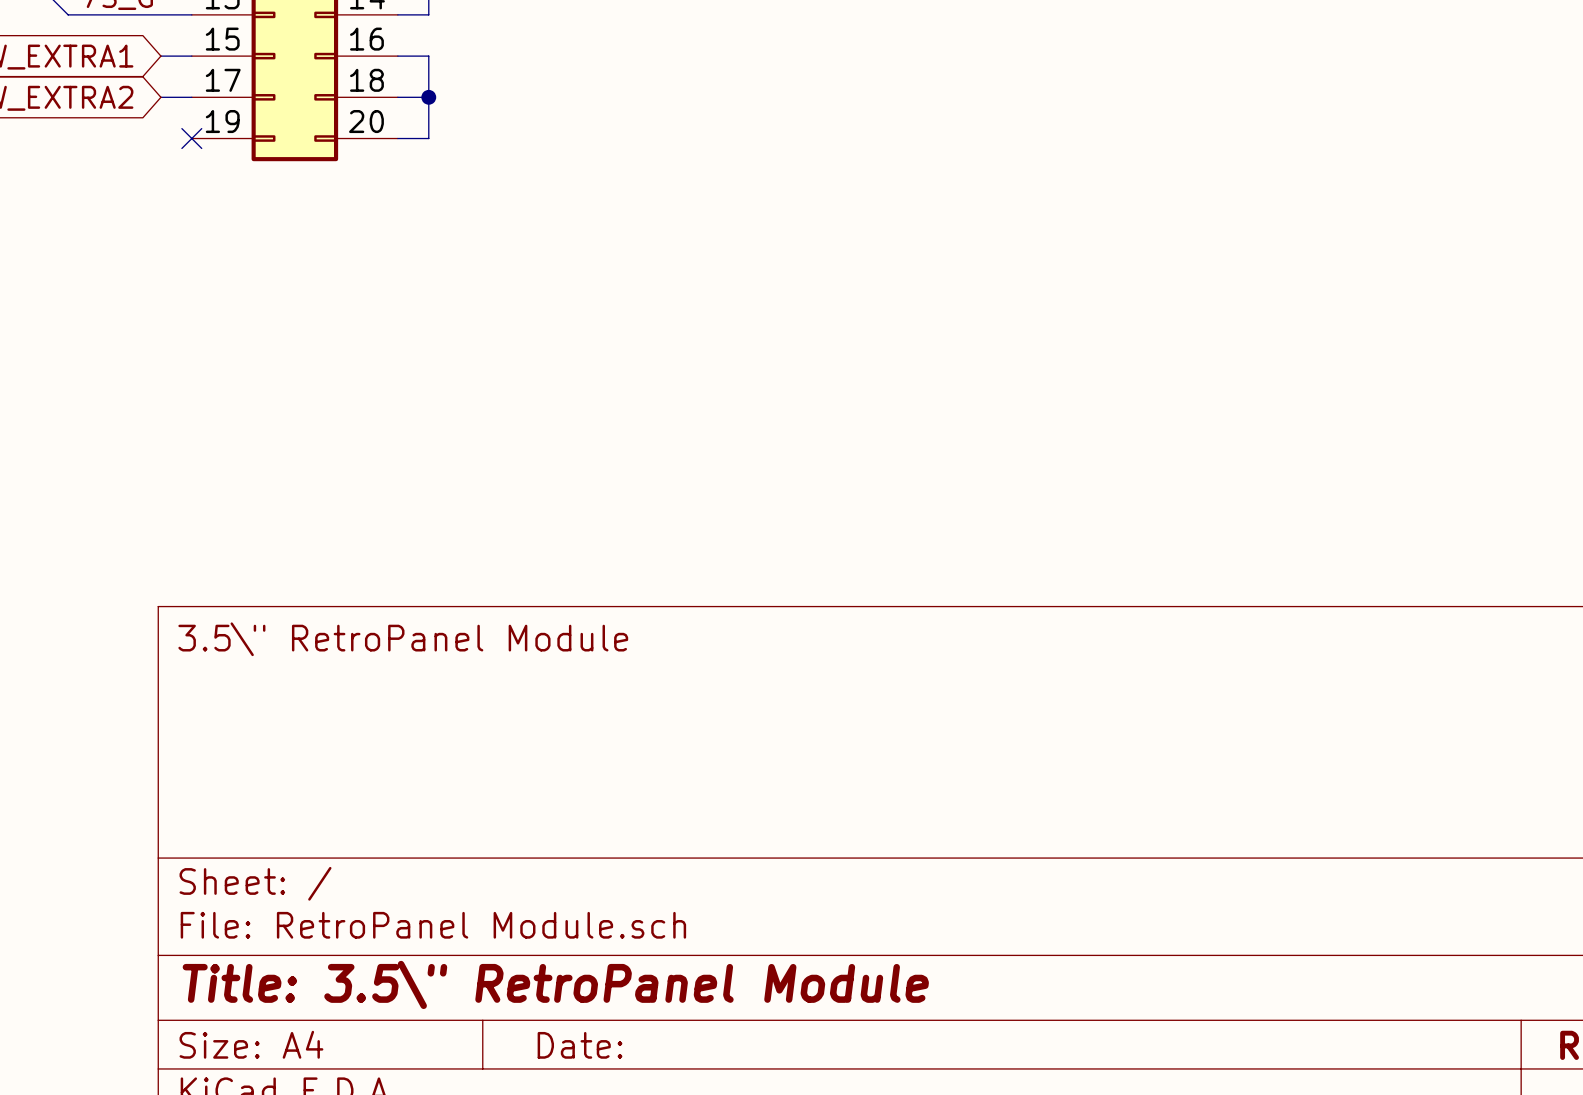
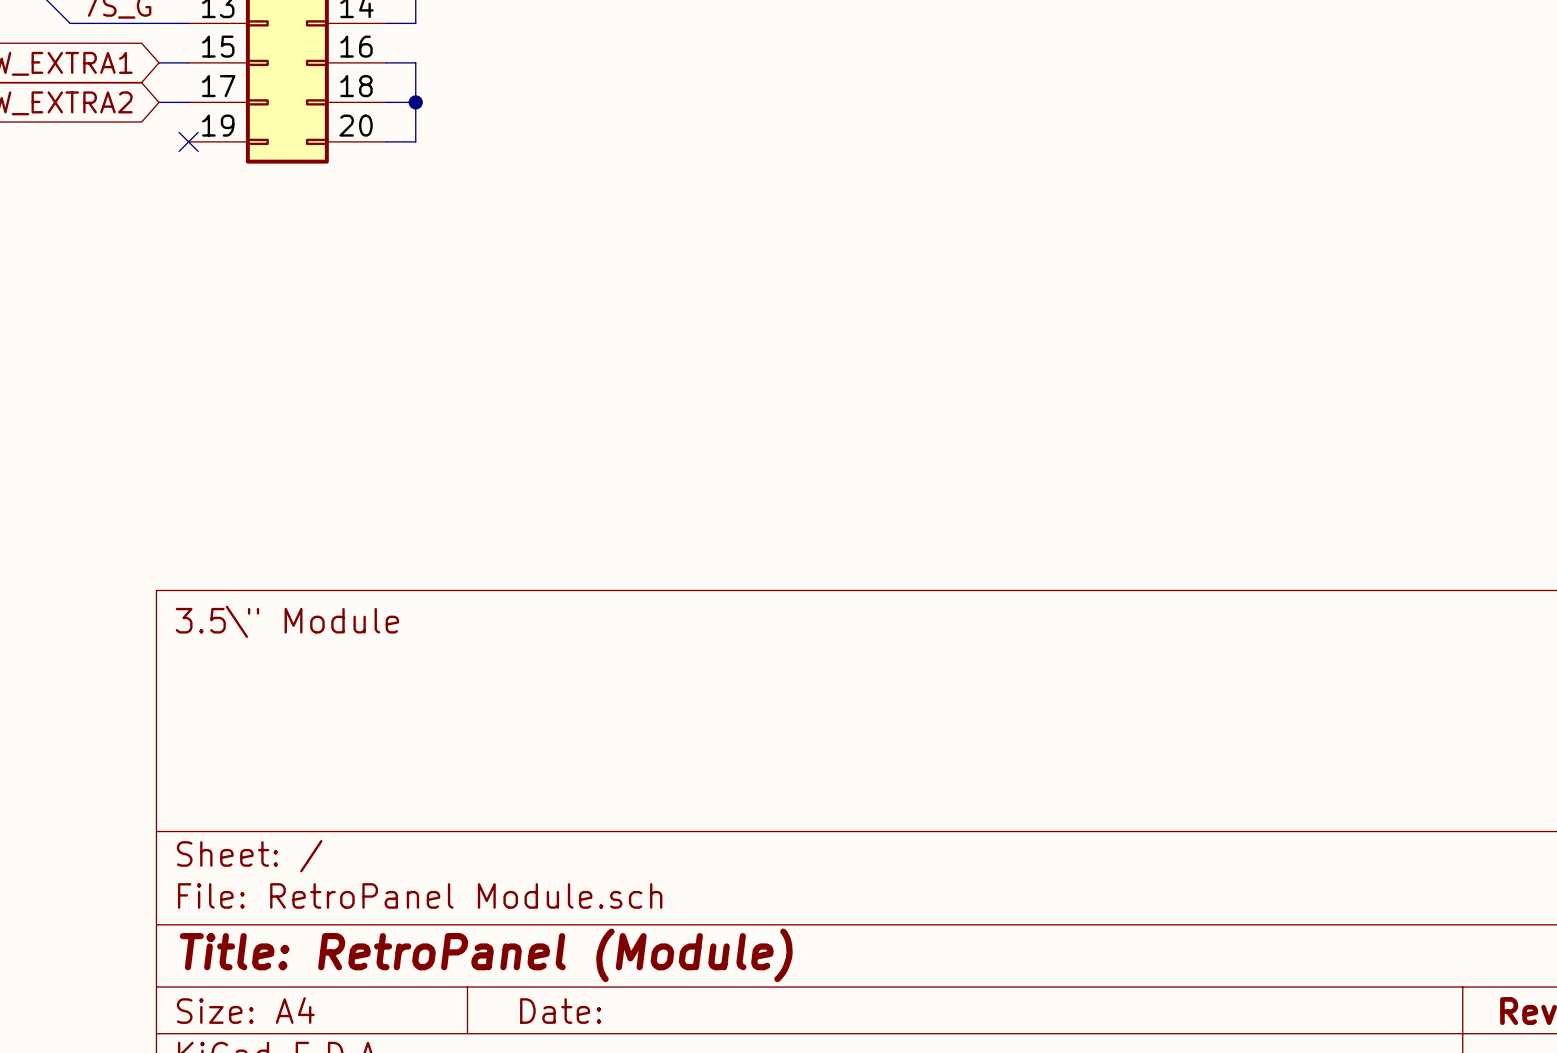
title block: 3.5\" RetroPanel Module (403, 639) -> 3.5\" Module (287, 621)
title block: Title: 3.5\" RetroPanel Module (555, 984) -> Title: RetroPanel (Module) (486, 955)

